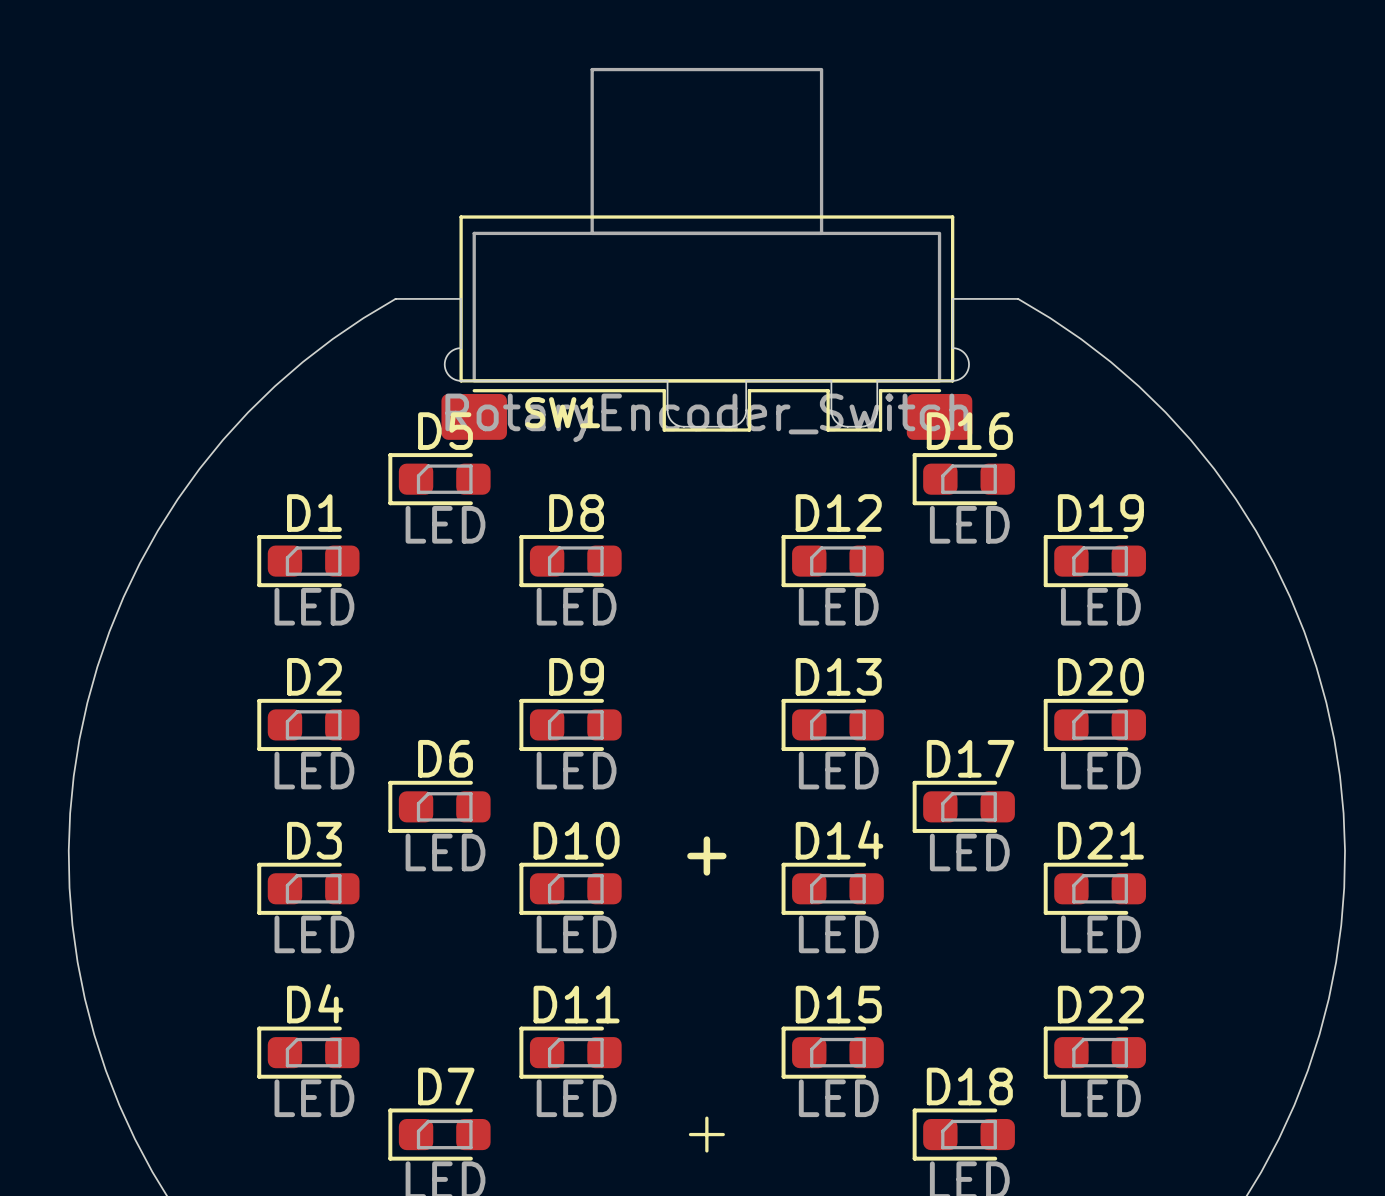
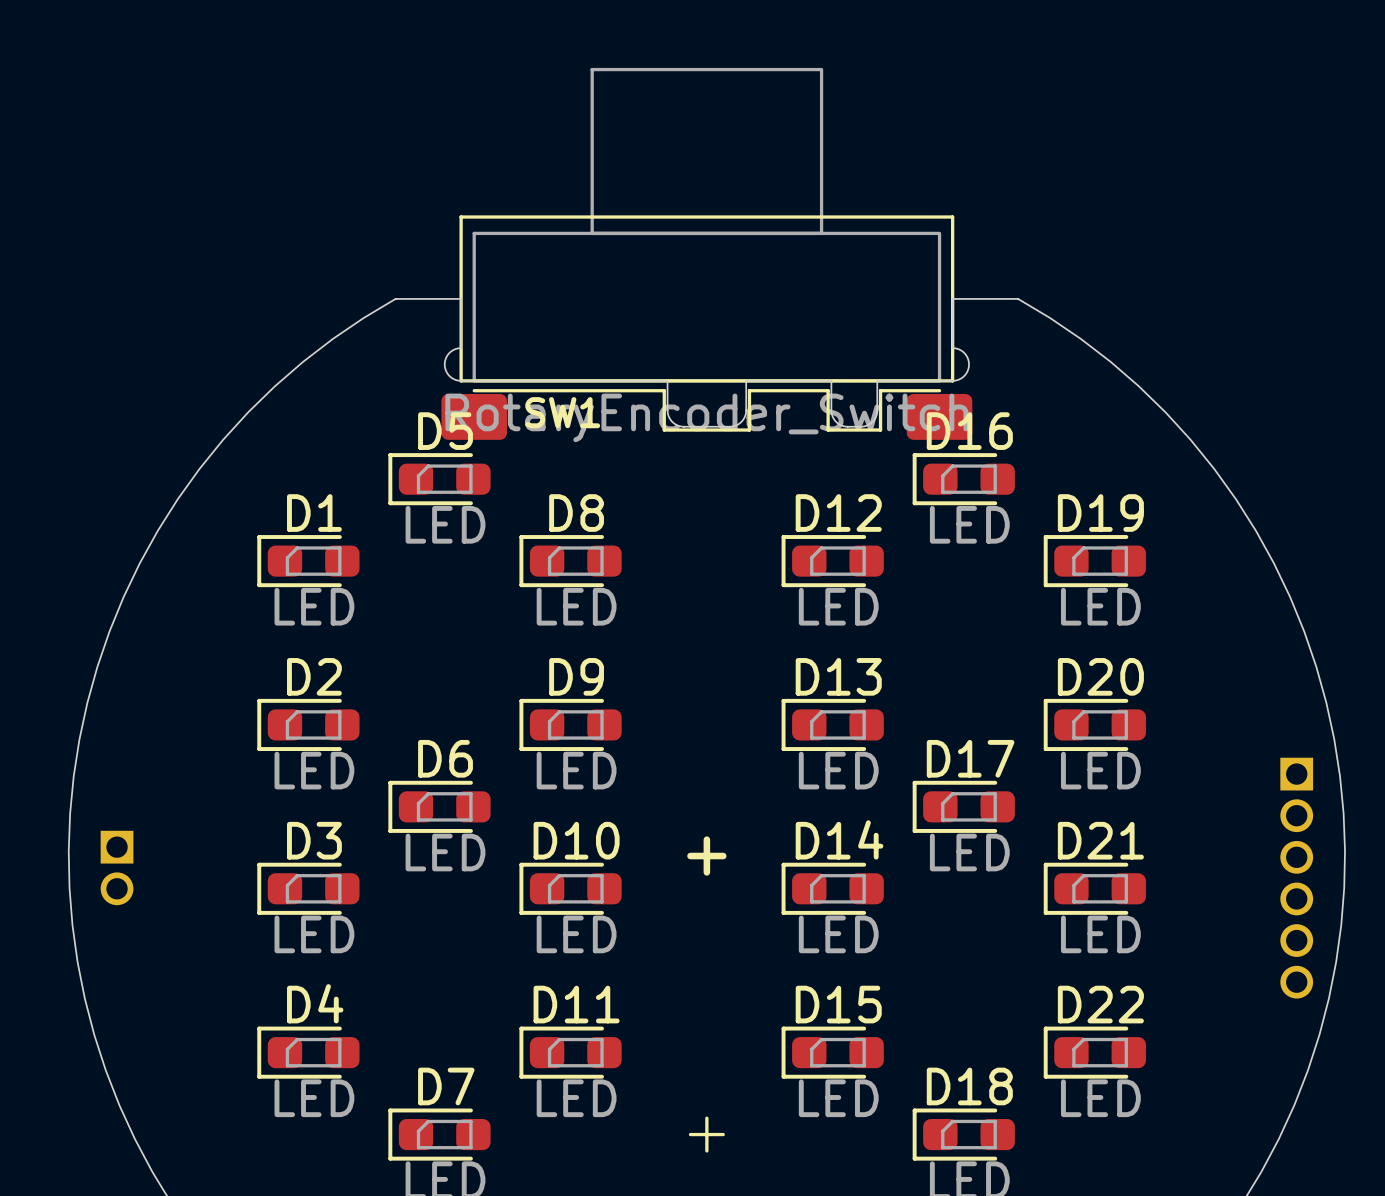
part: none -> (117, 867)
part: none -> (1296, 878)

